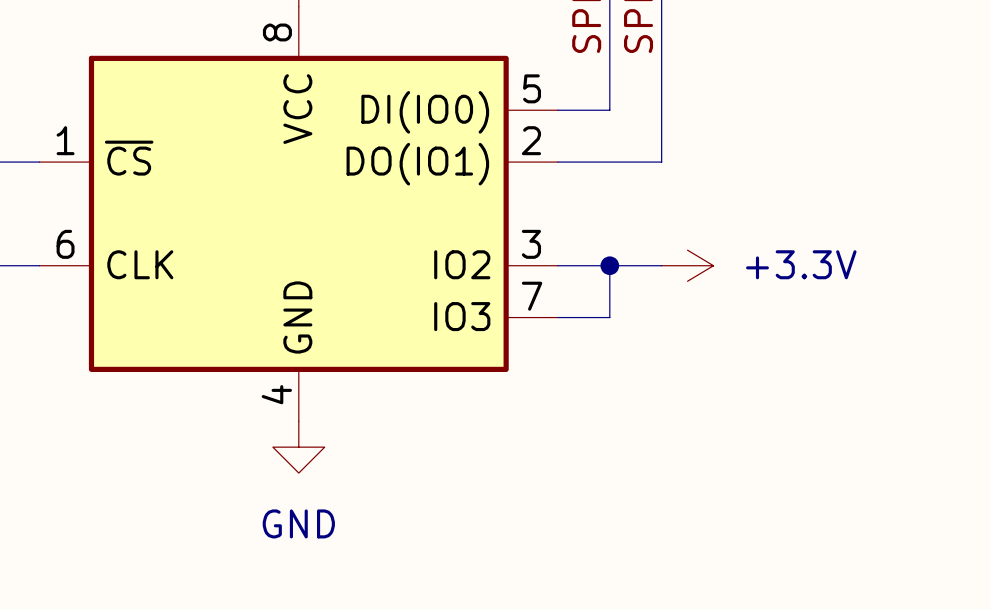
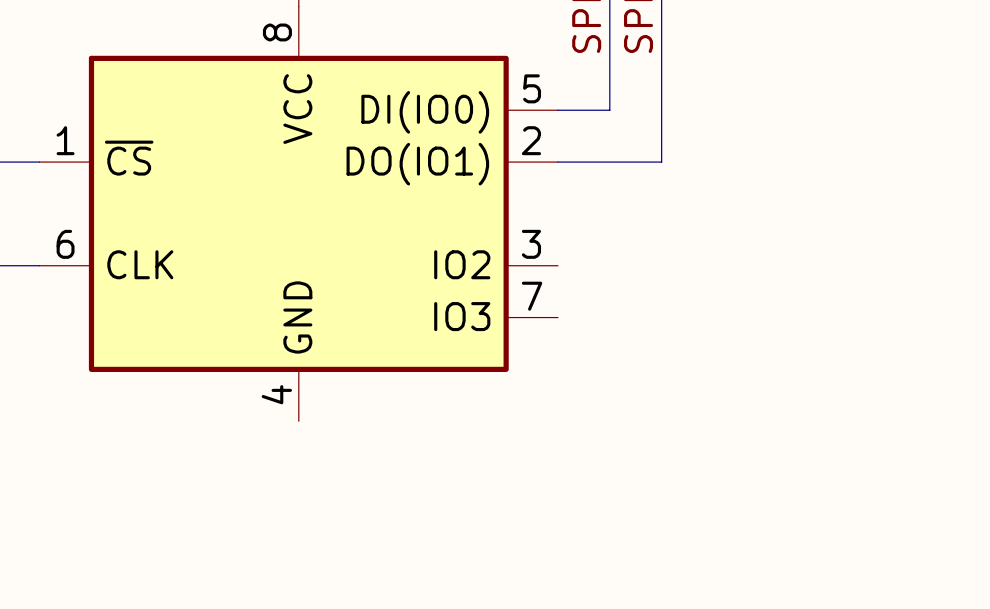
wire: (557, 265) (661, 265) -> none
wire: (609, 265) (609, 317) (557, 317) -> none
junction: (609, 265) -> none
power symbol: +3.3V (687, 265) -> none
power symbol: GND (298, 447) -> none

